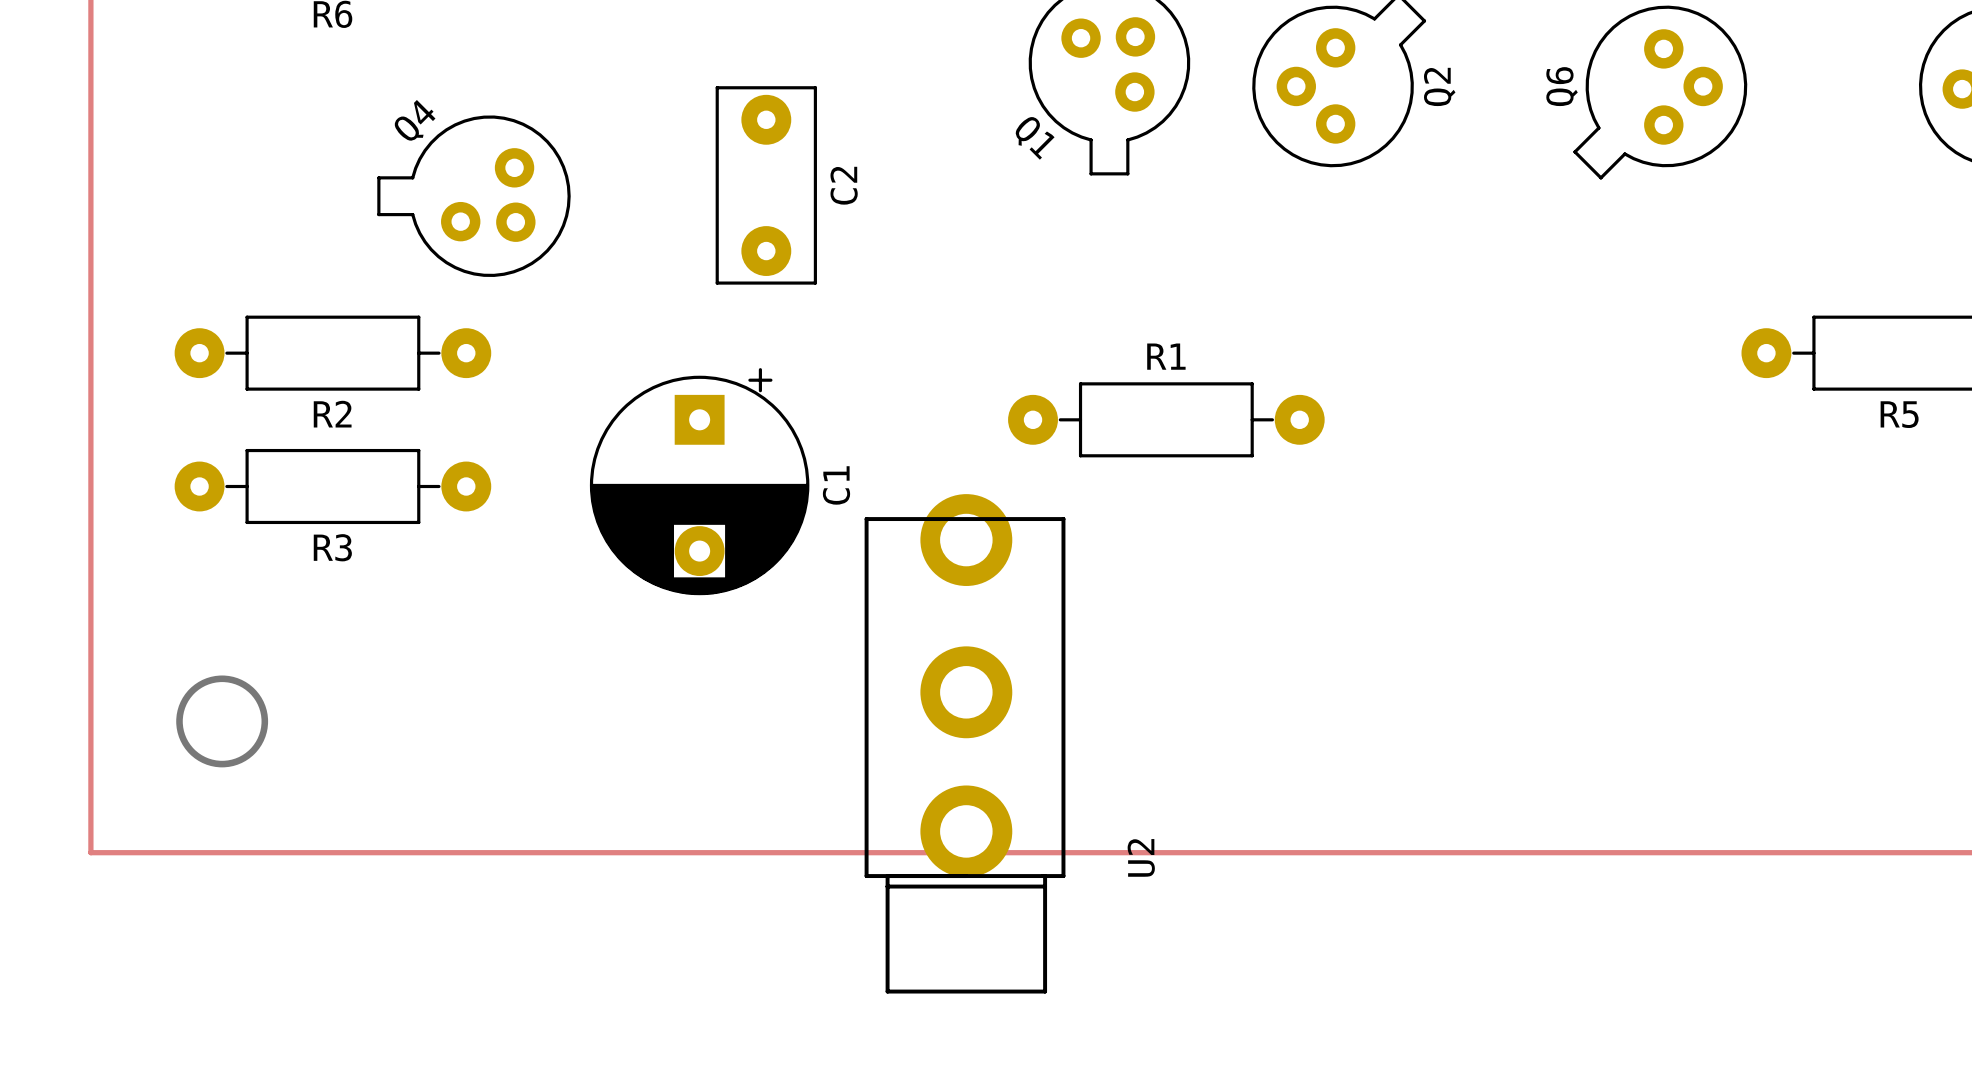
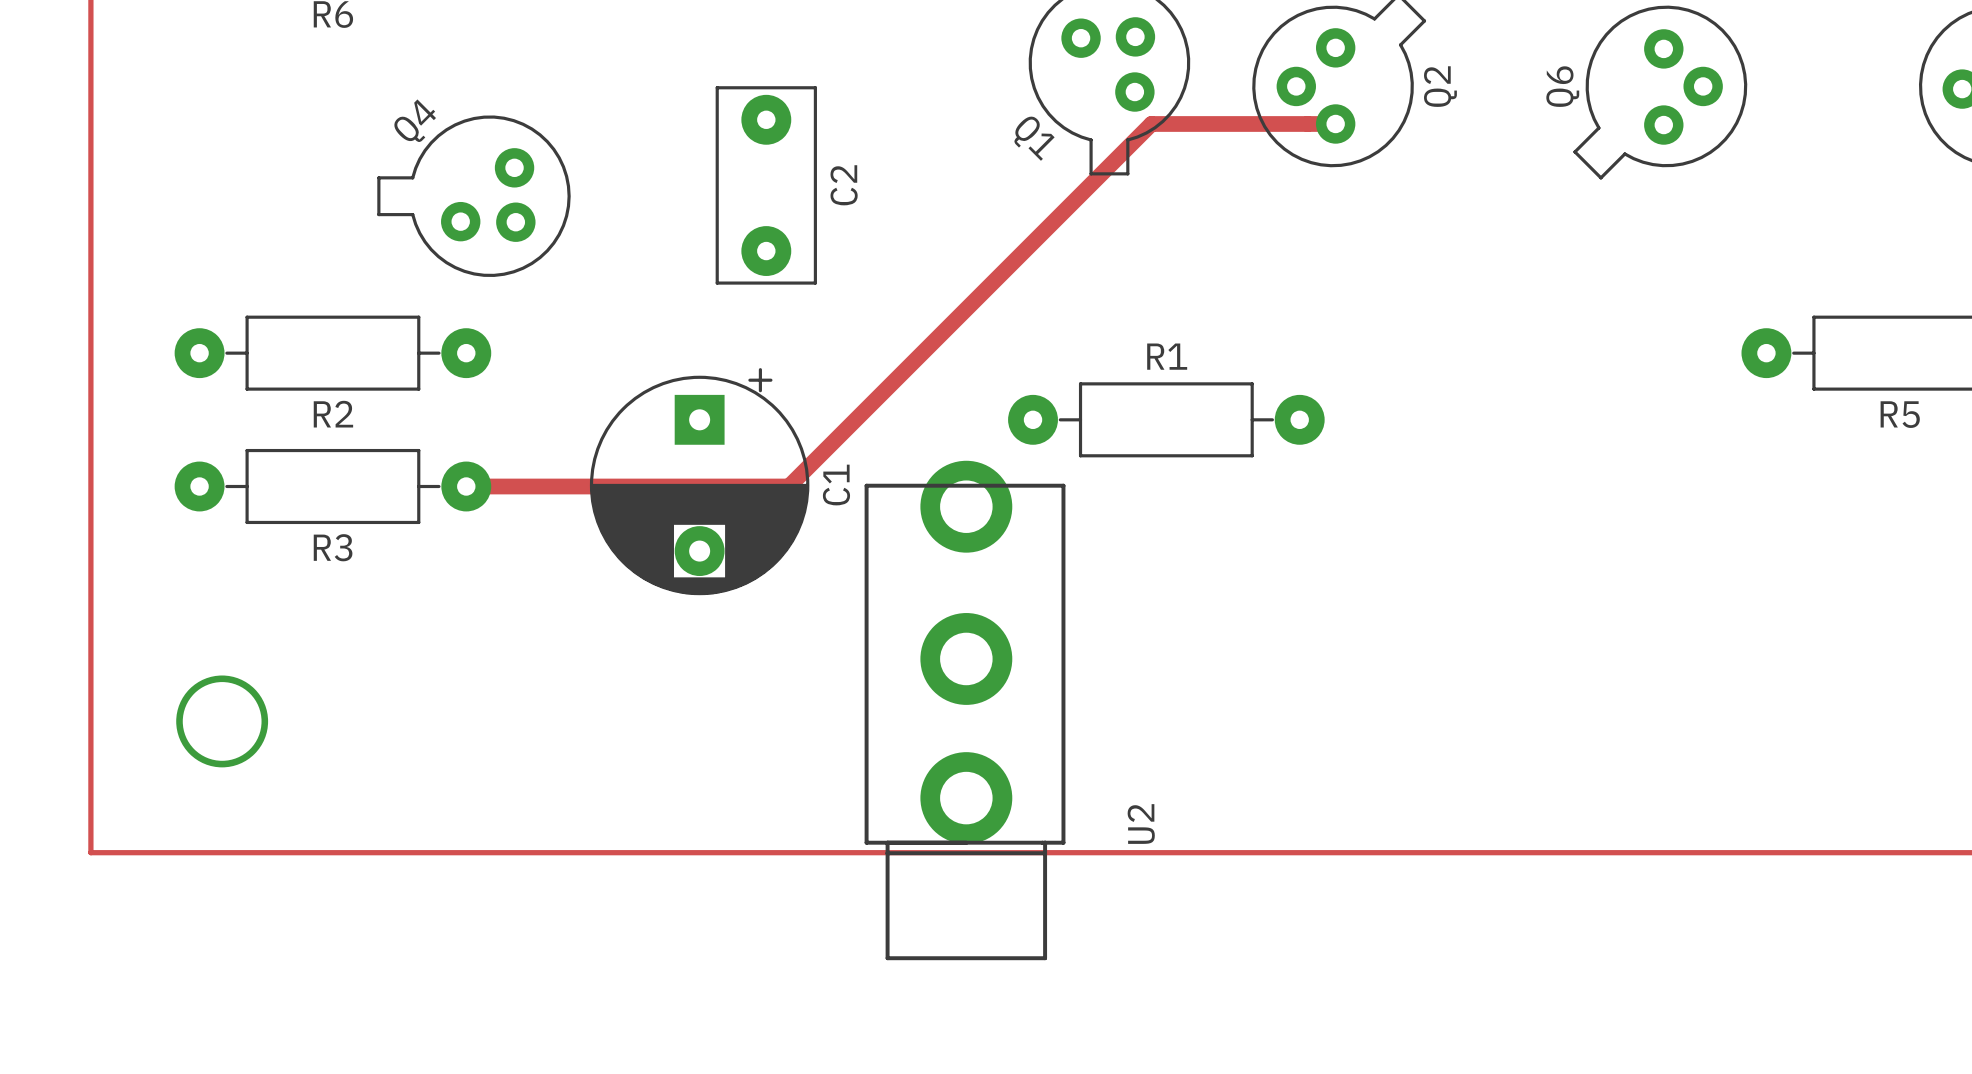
track: none -> (1335, 123) (1151, 123) (788, 486) (466, 486)
U2 position: (965, 743) -> (965, 710)

